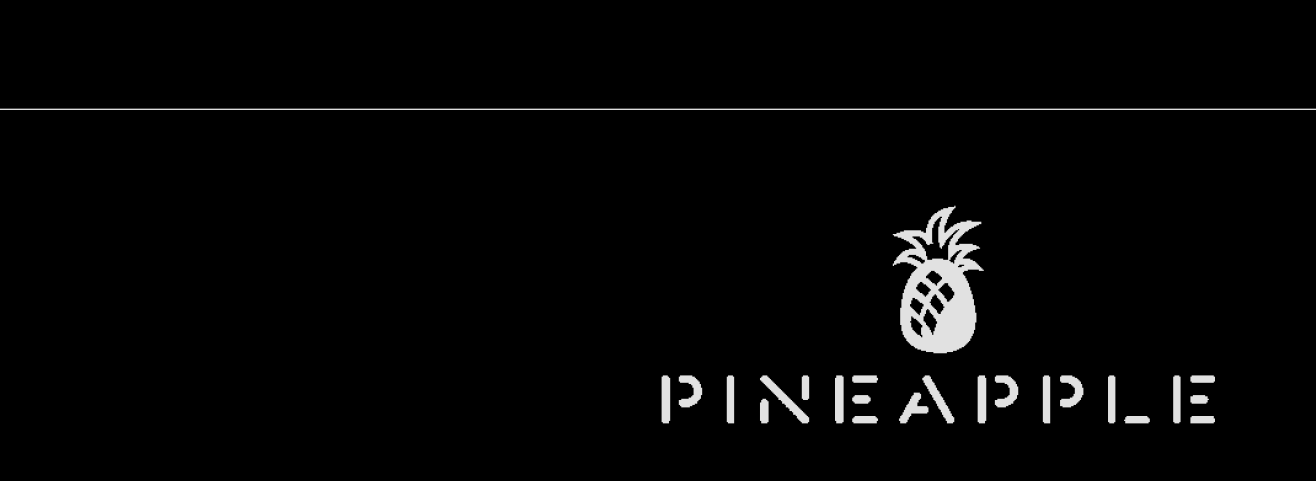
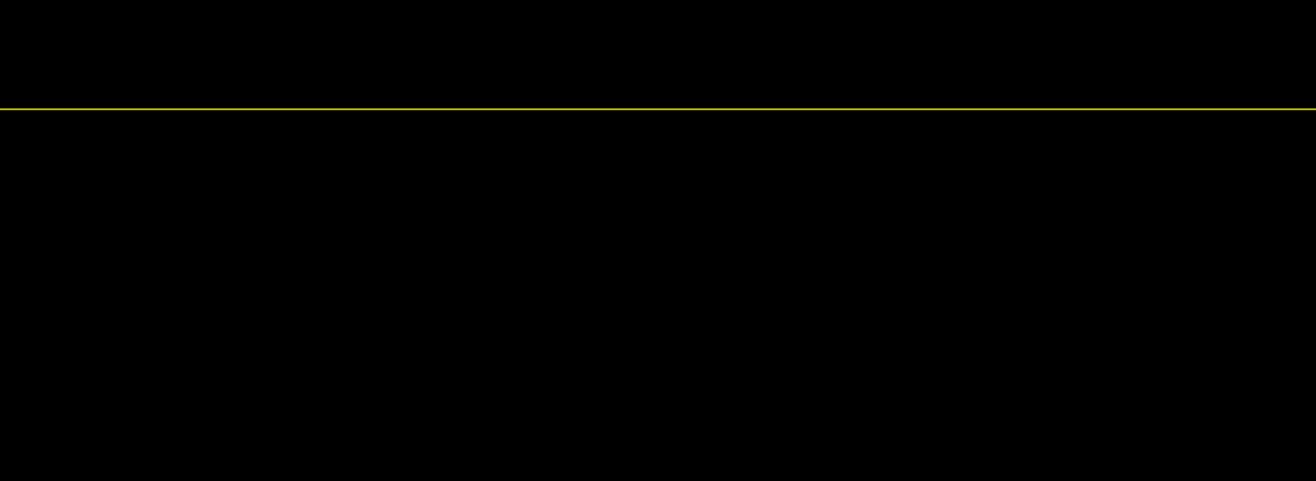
drawing: [661, 205, 1216, 424] -> none

